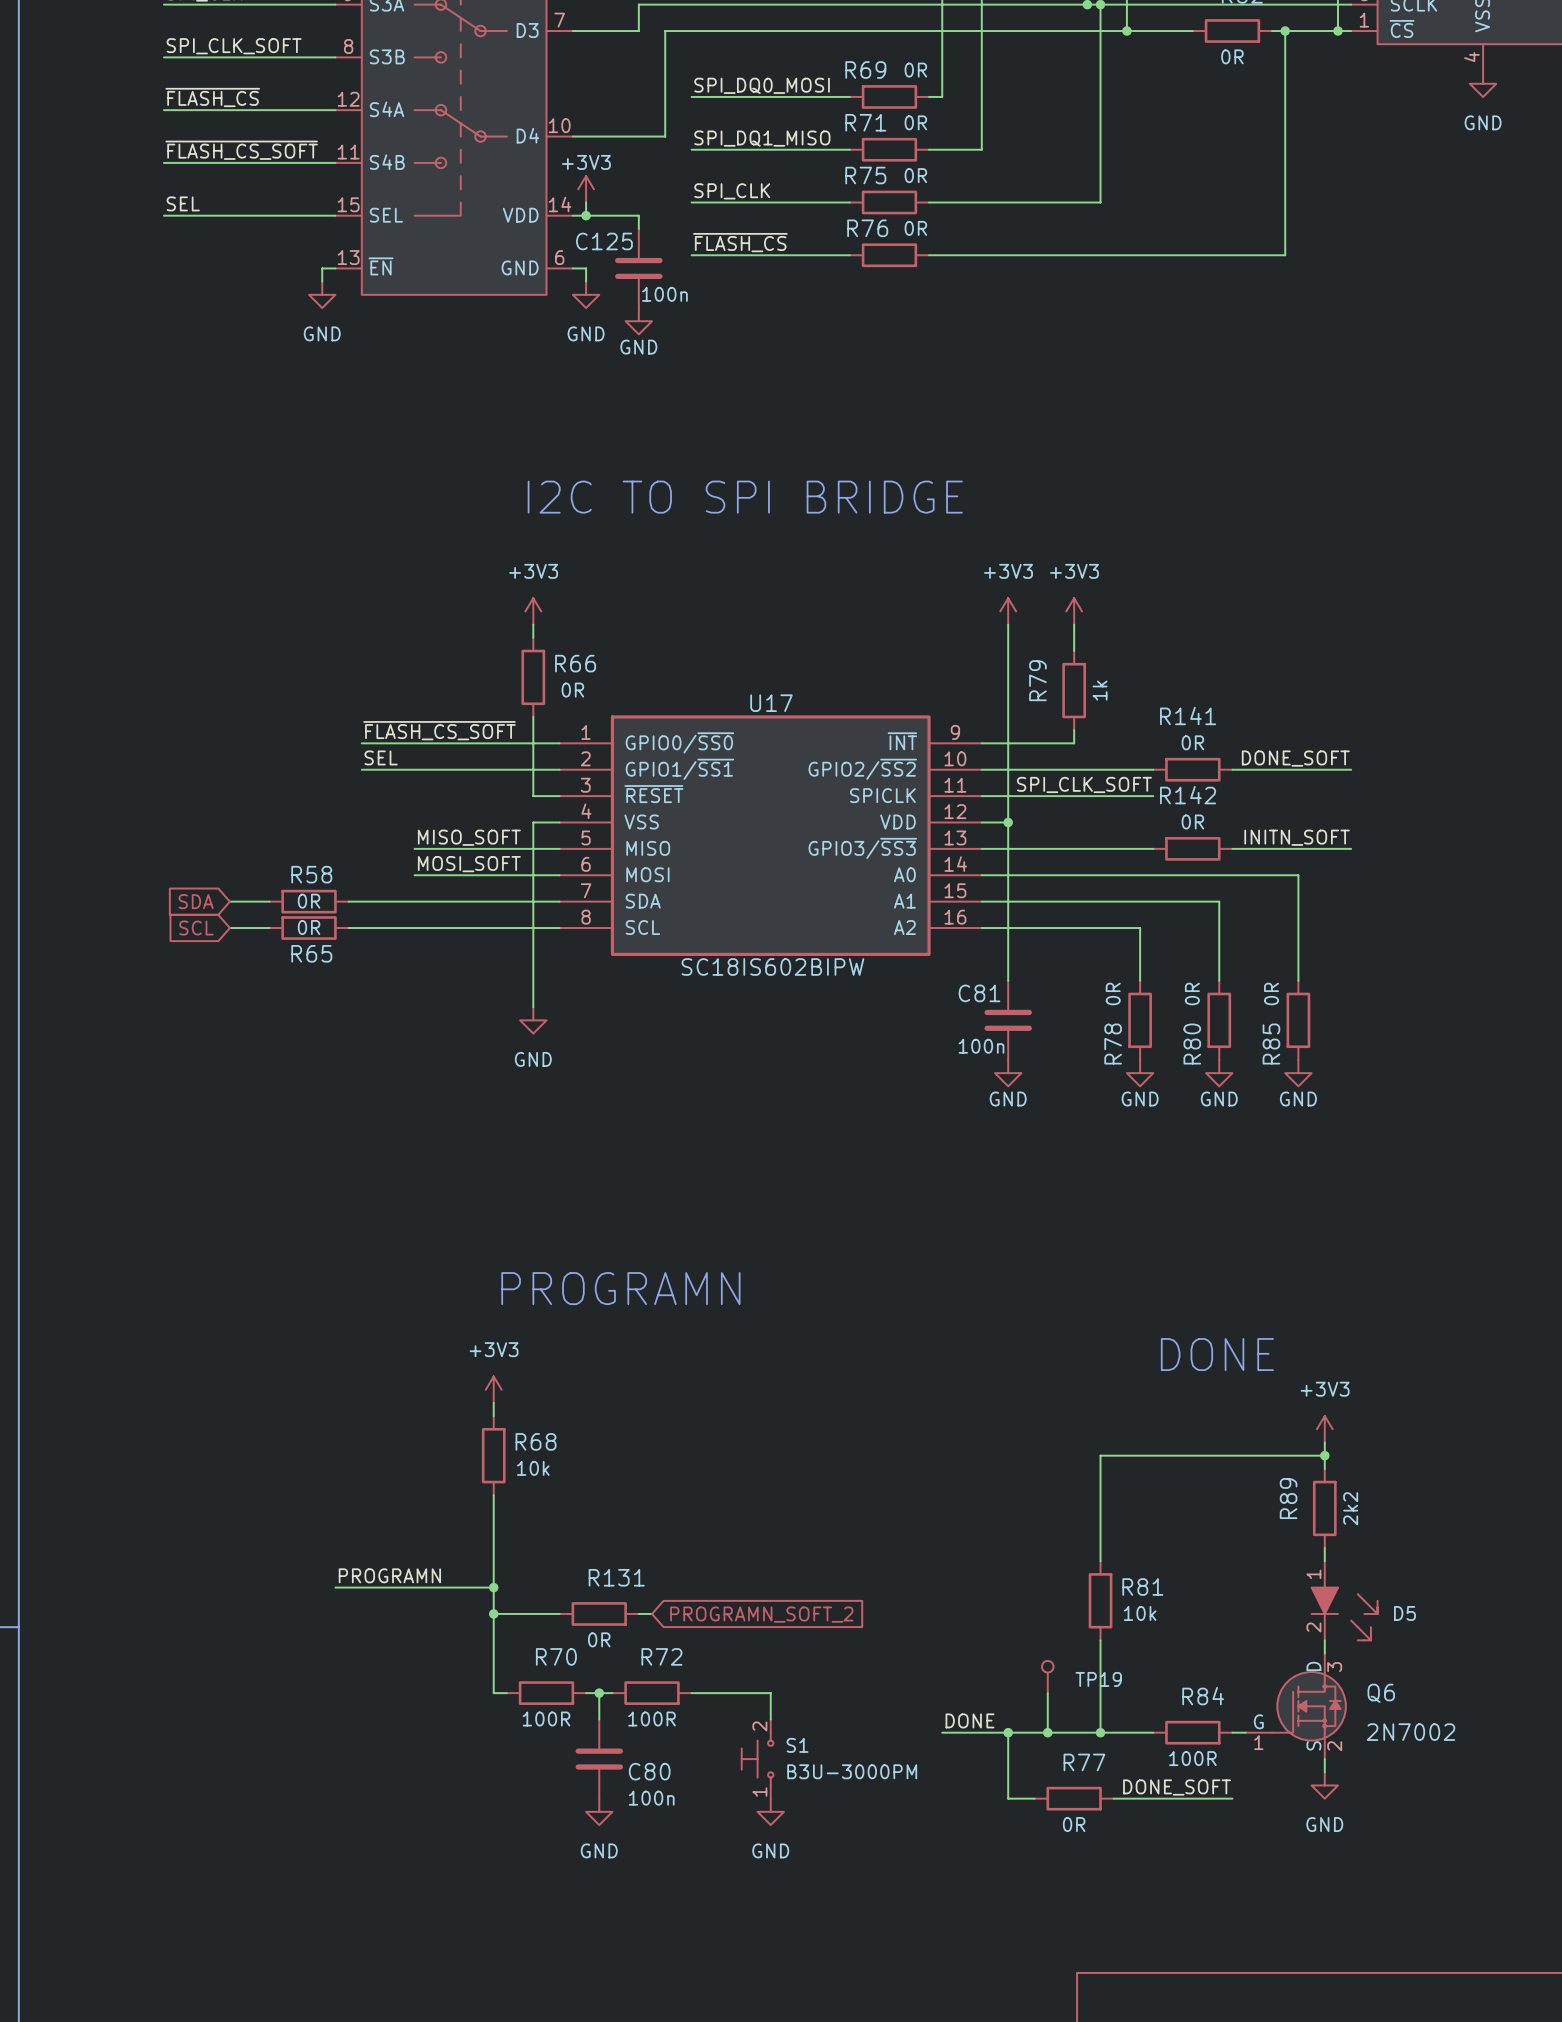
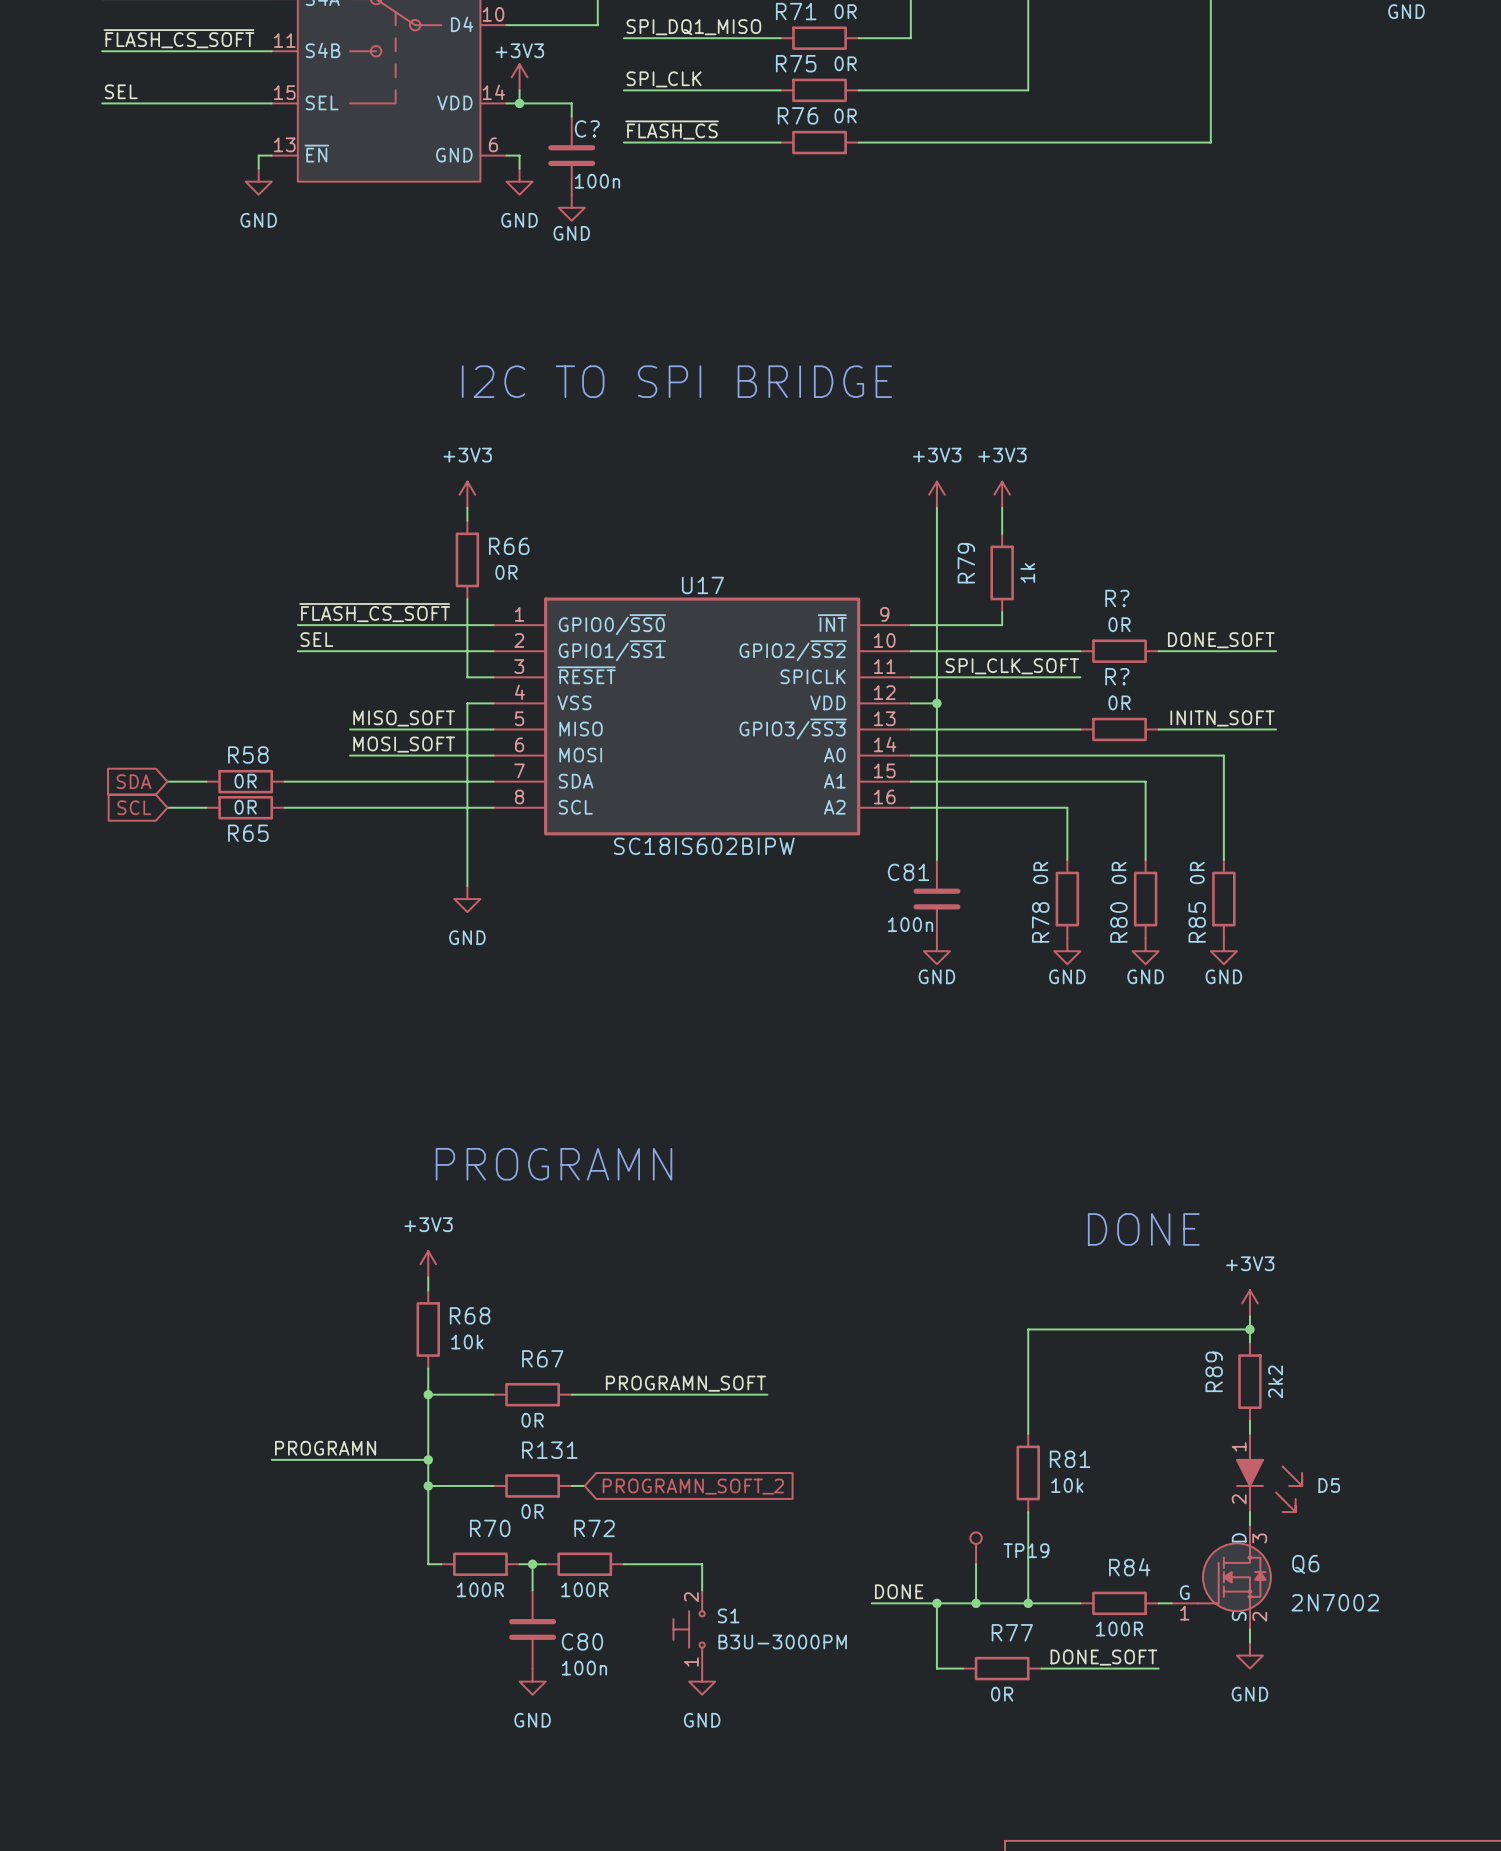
C125 name: C125 (604, 241) -> C? (587, 128)
R141 name: R141 (1188, 715) -> R? (1117, 598)
R142 name: R142 (1188, 795) -> R? (1117, 676)
label: none -> PROGRAMN_SOFT (685, 1383)
wire: none -> (428, 1394) (493, 1394)
junction: none -> (428, 1394)
R67: none -> (532, 1394)
wire: none -> (571, 1394) (767, 1394)

